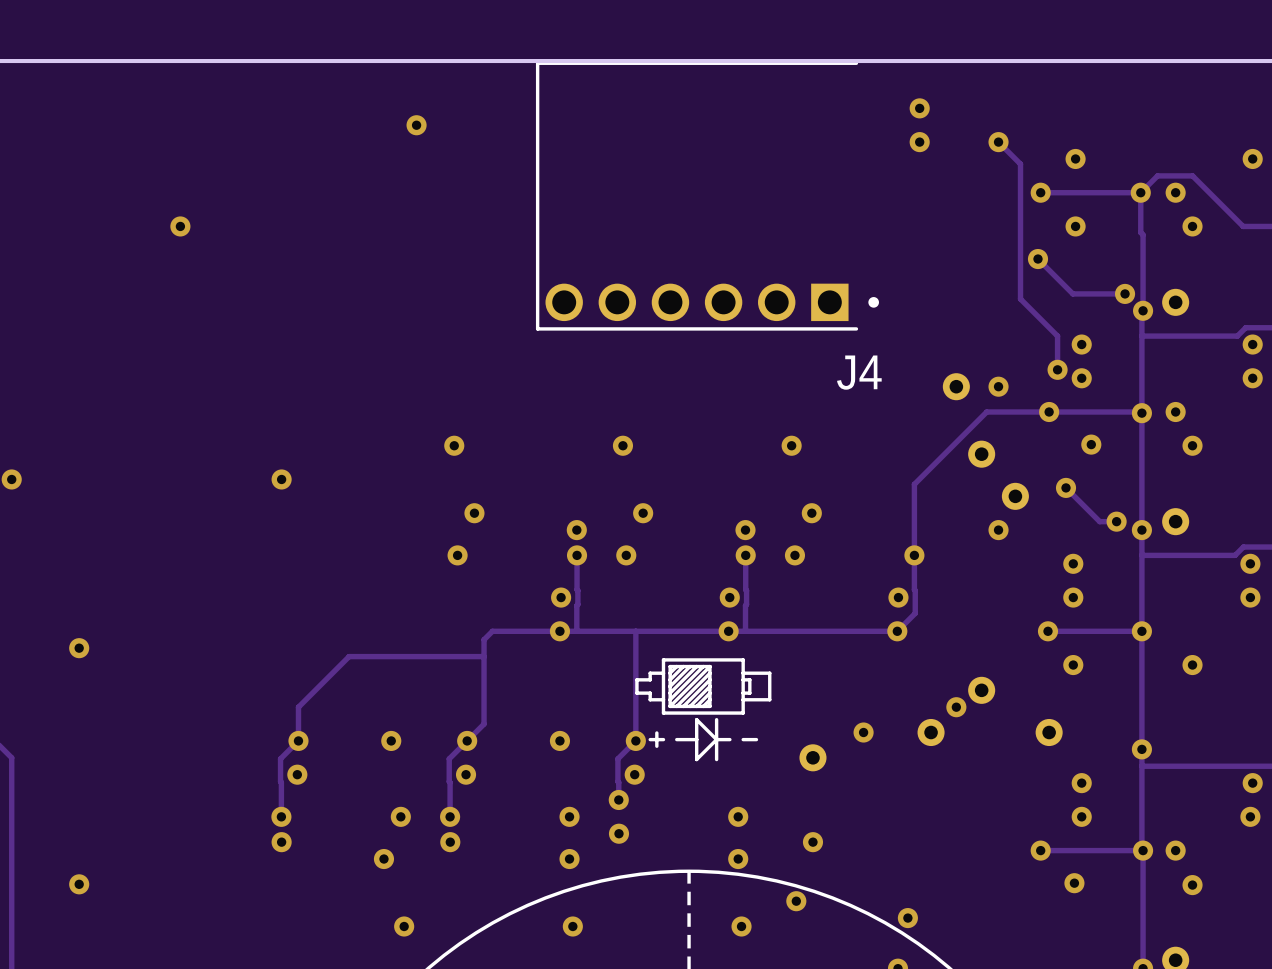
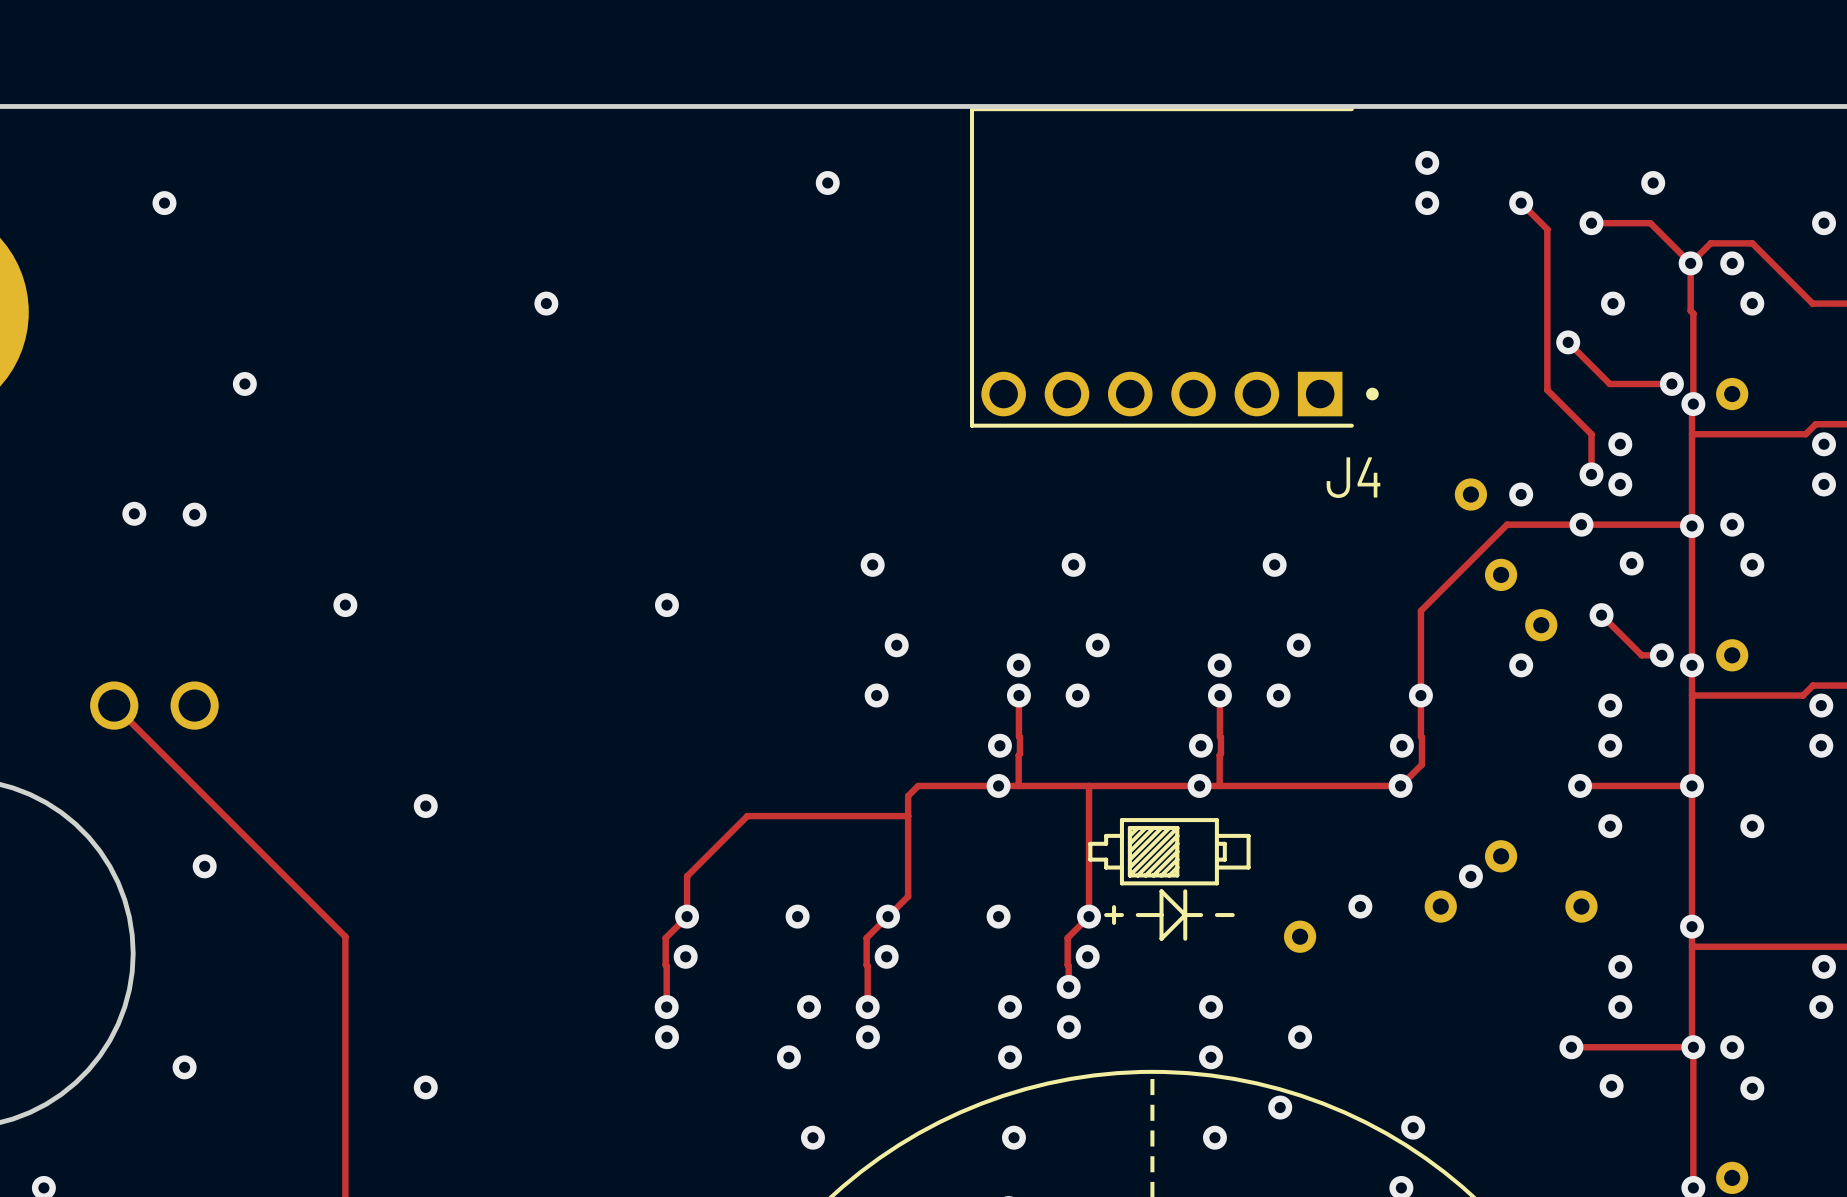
via: none -> (1653, 182)
via position: (1075, 158) -> (1591, 223)
track: (1040, 192) (1140, 192) -> (1591, 223) (1650, 223) (1690, 263)
via: (1040, 192) -> none

